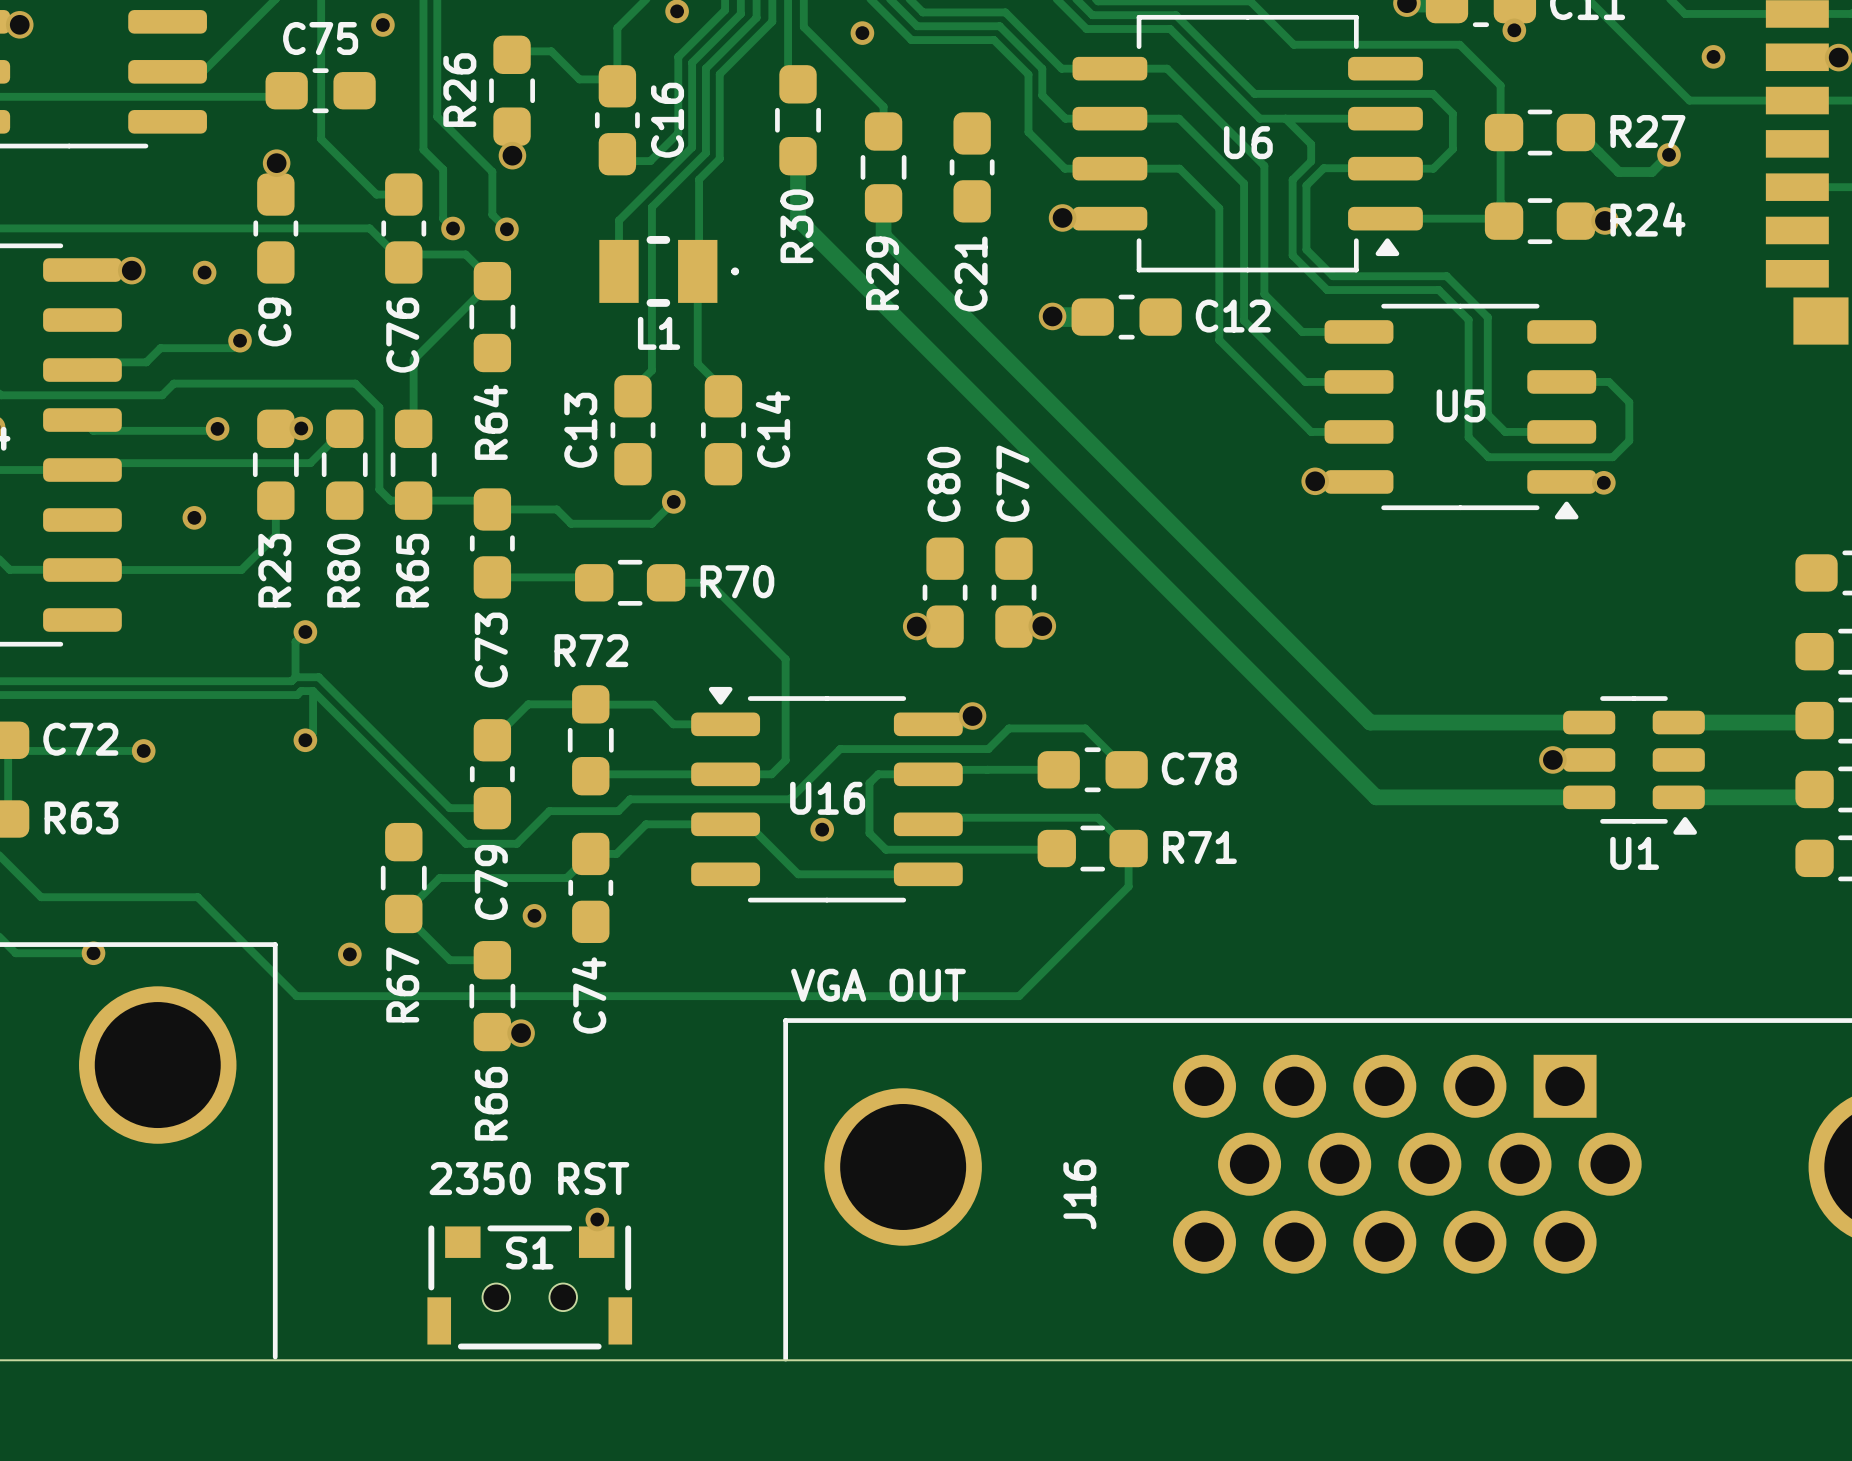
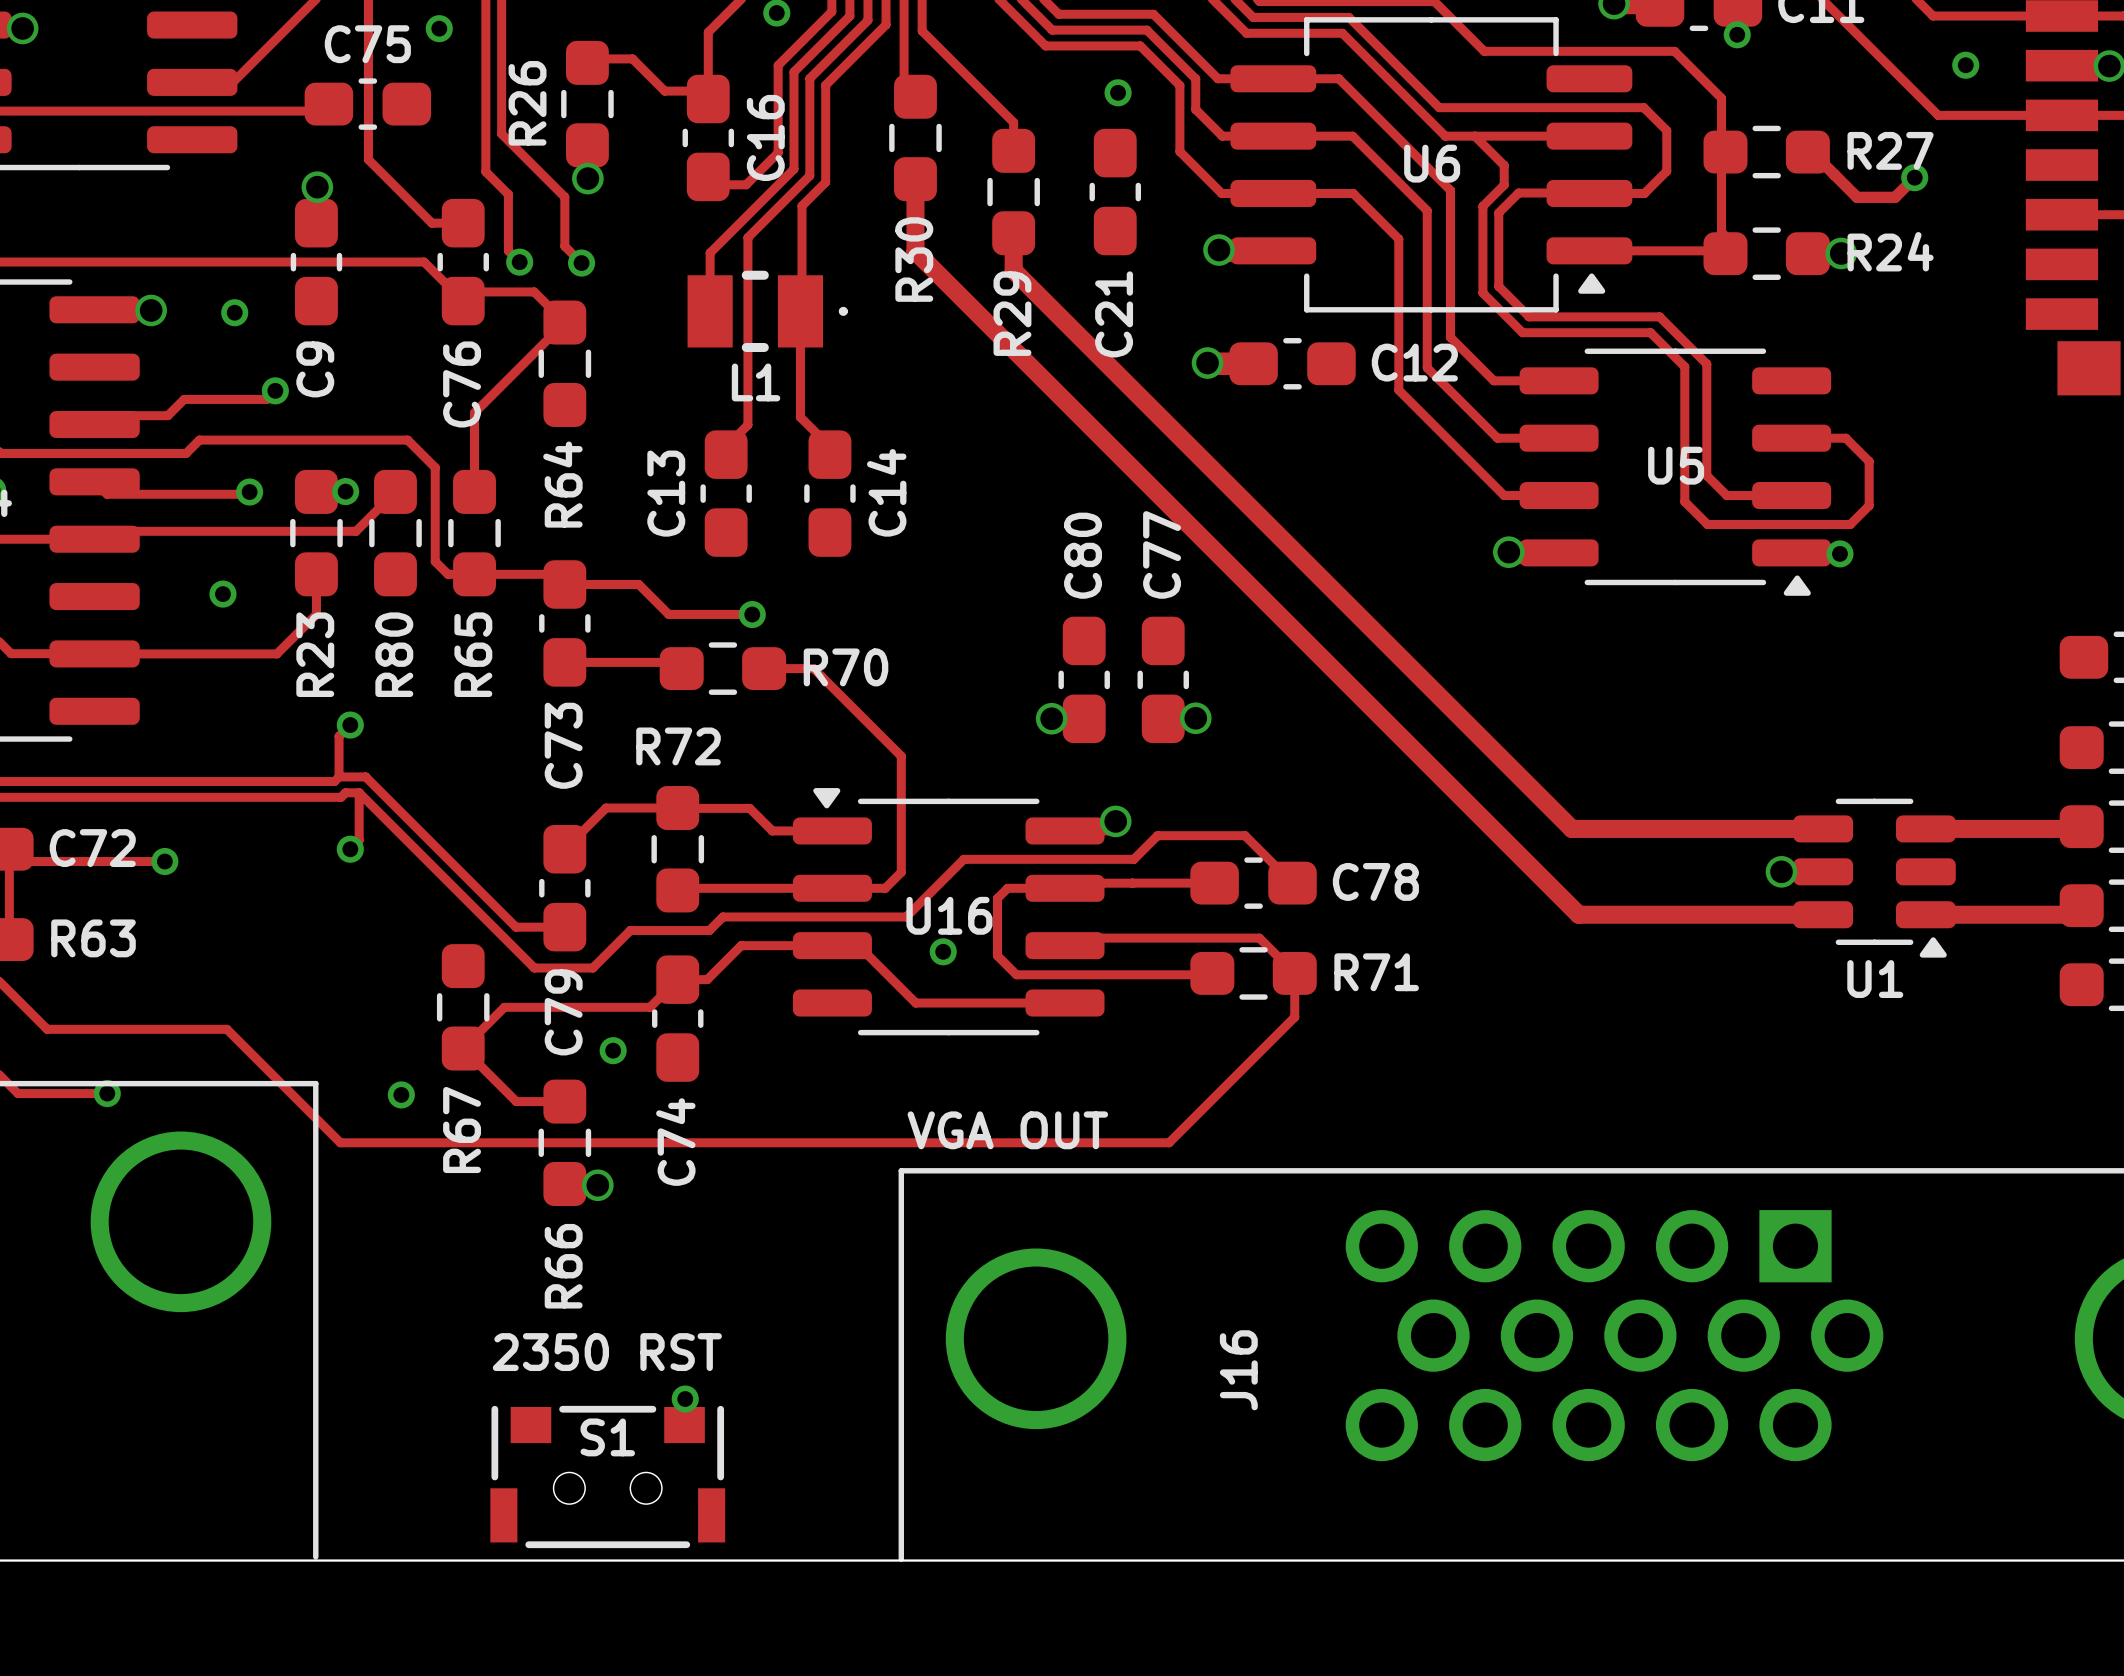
via position: (862, 33) -> (1118, 92)
track: (673, 501) (651, 523) (571, 523) -> (752, 614) (668, 614) (655, 600)
via position: (673, 501) -> (752, 614)

